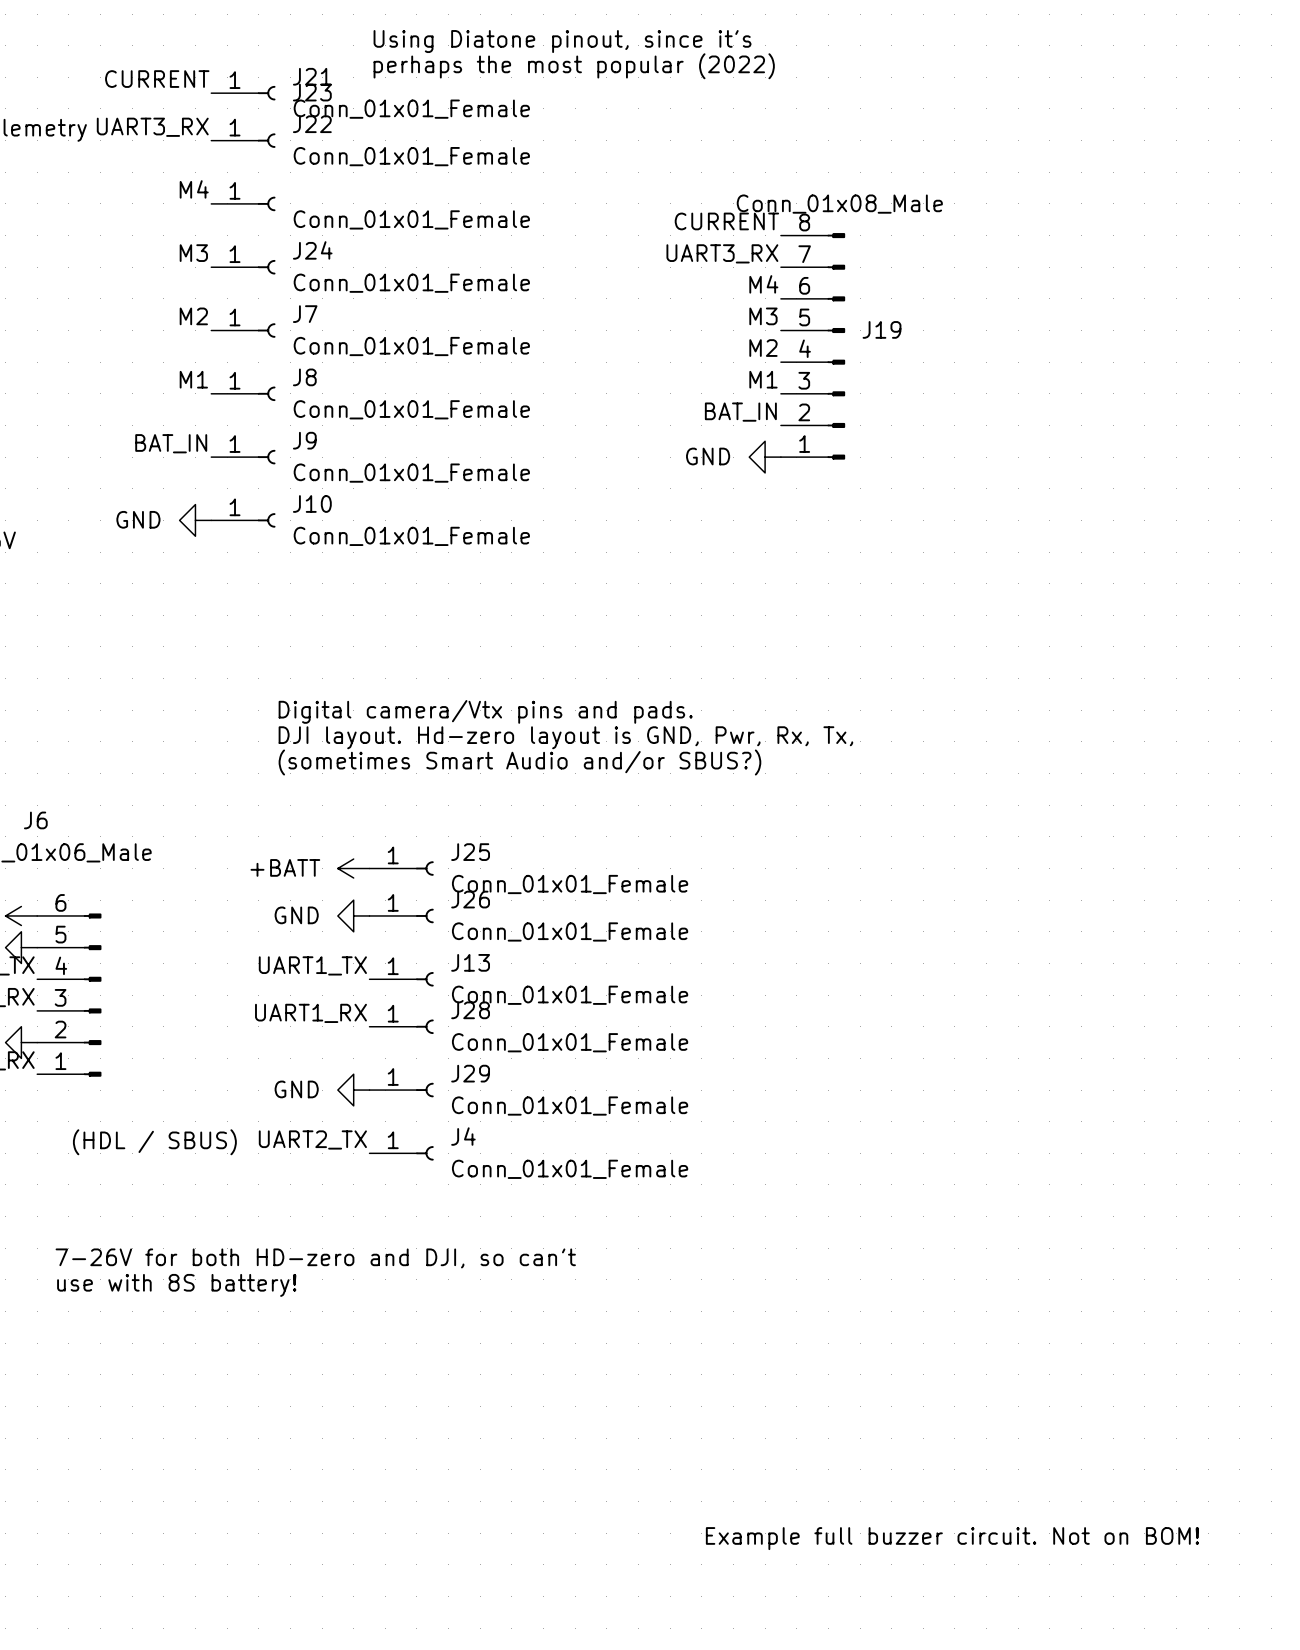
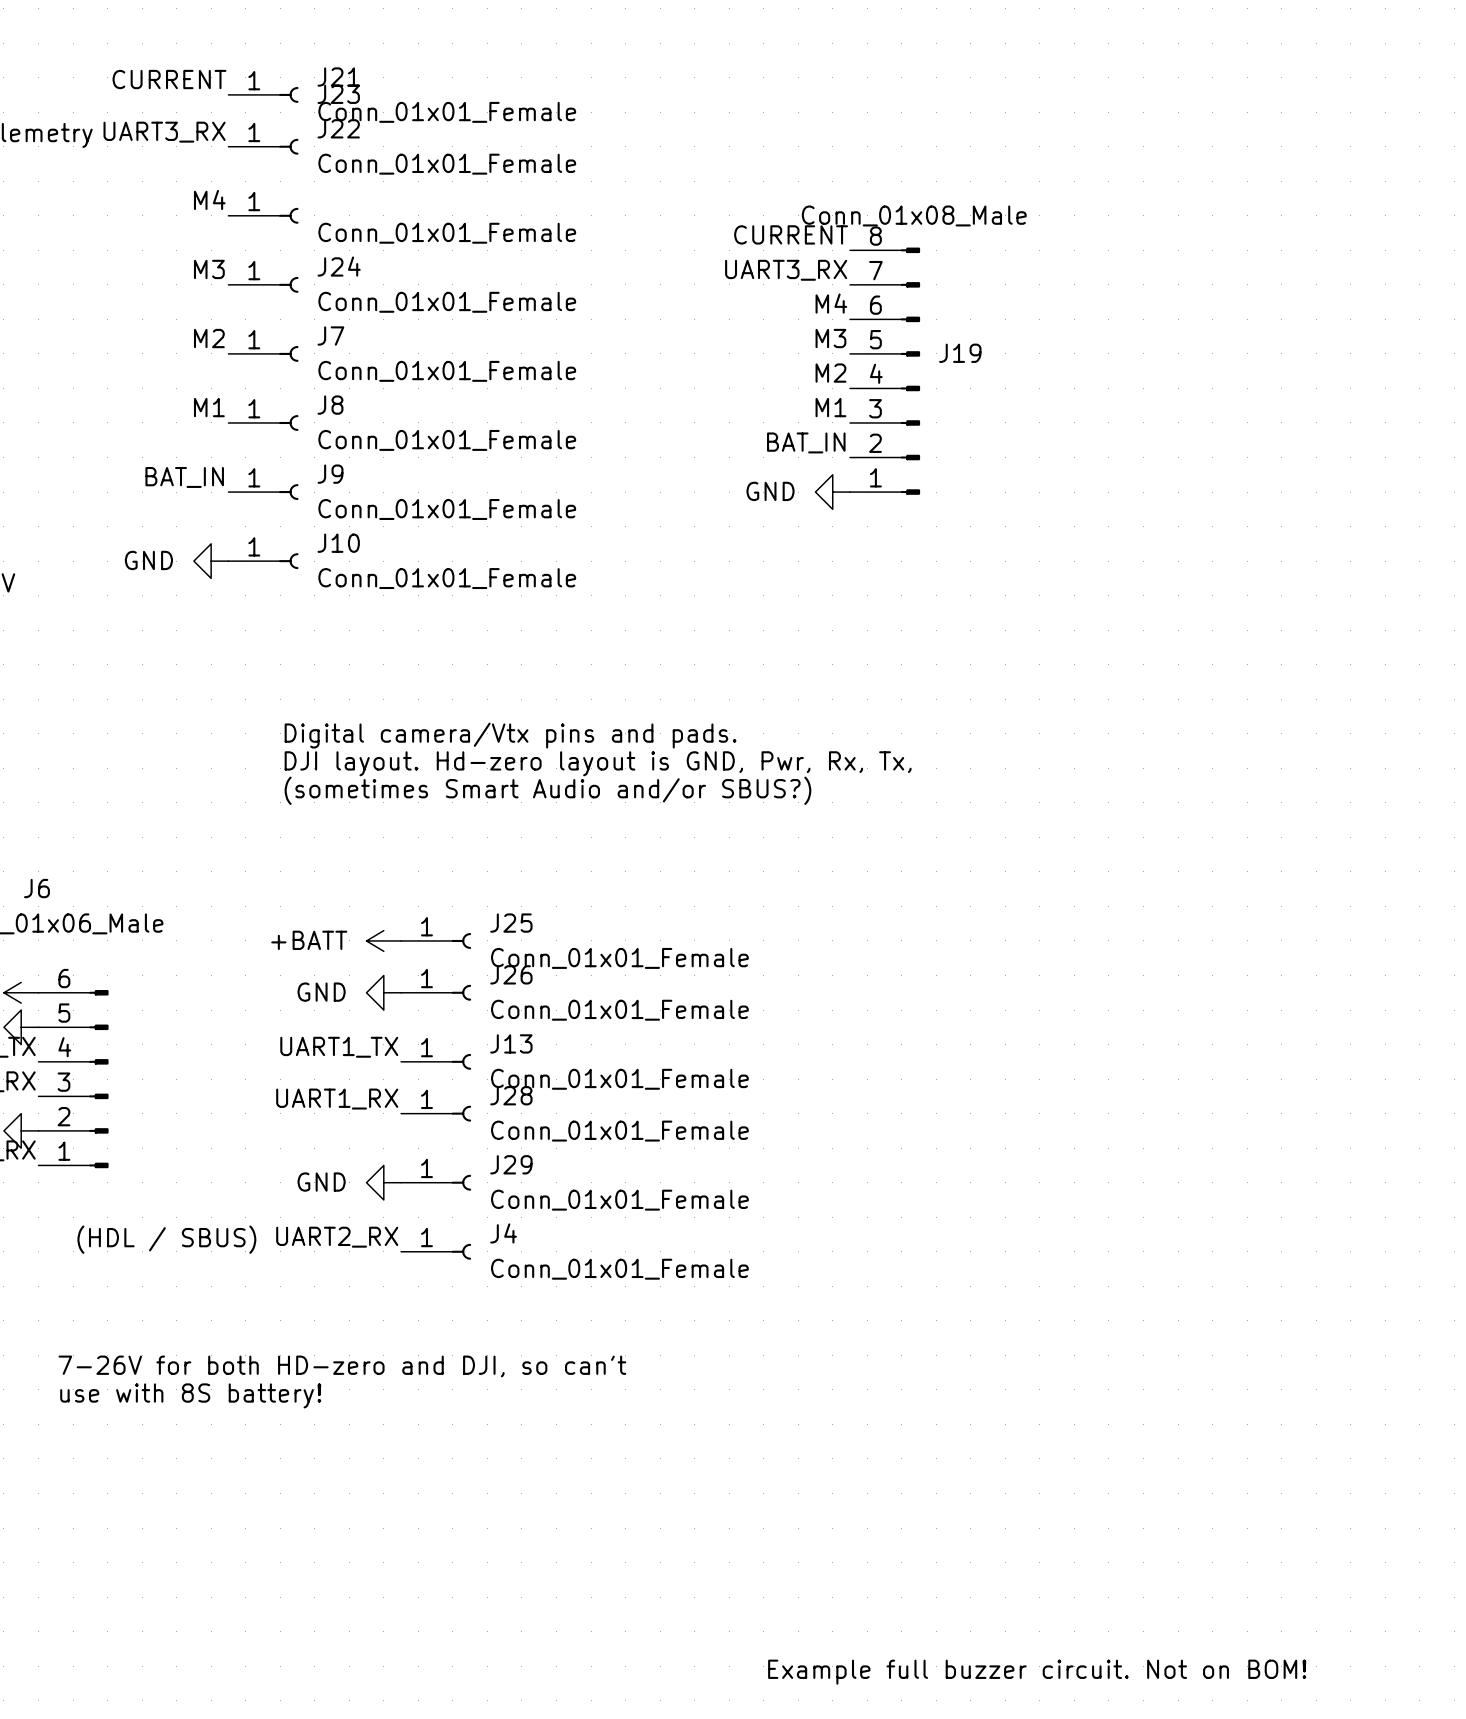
text: Using Diatone pinout, since it's (562, 41) -> none
text: perhaps the most popular (2022) (574, 66) -> none
text position: Digital camera/Vtx pins and pads. (485, 711) -> Digital camera/Vtx pins and pads. (510, 735)
text position: DJI layout. Hd-zero layout is GND, Pwr, Rx, Tx, (565, 737) -> DJI layout. Hd-zero layout is GND, Pwr, Rx, Tx, (598, 763)
text position: (sometimes Smart Audio and/or SBUS?) (519, 762) -> (sometimes Smart Audio and/or SBUS?) (547, 790)
label: UART2_TX (312, 1139) -> UART2_RX (337, 1237)

